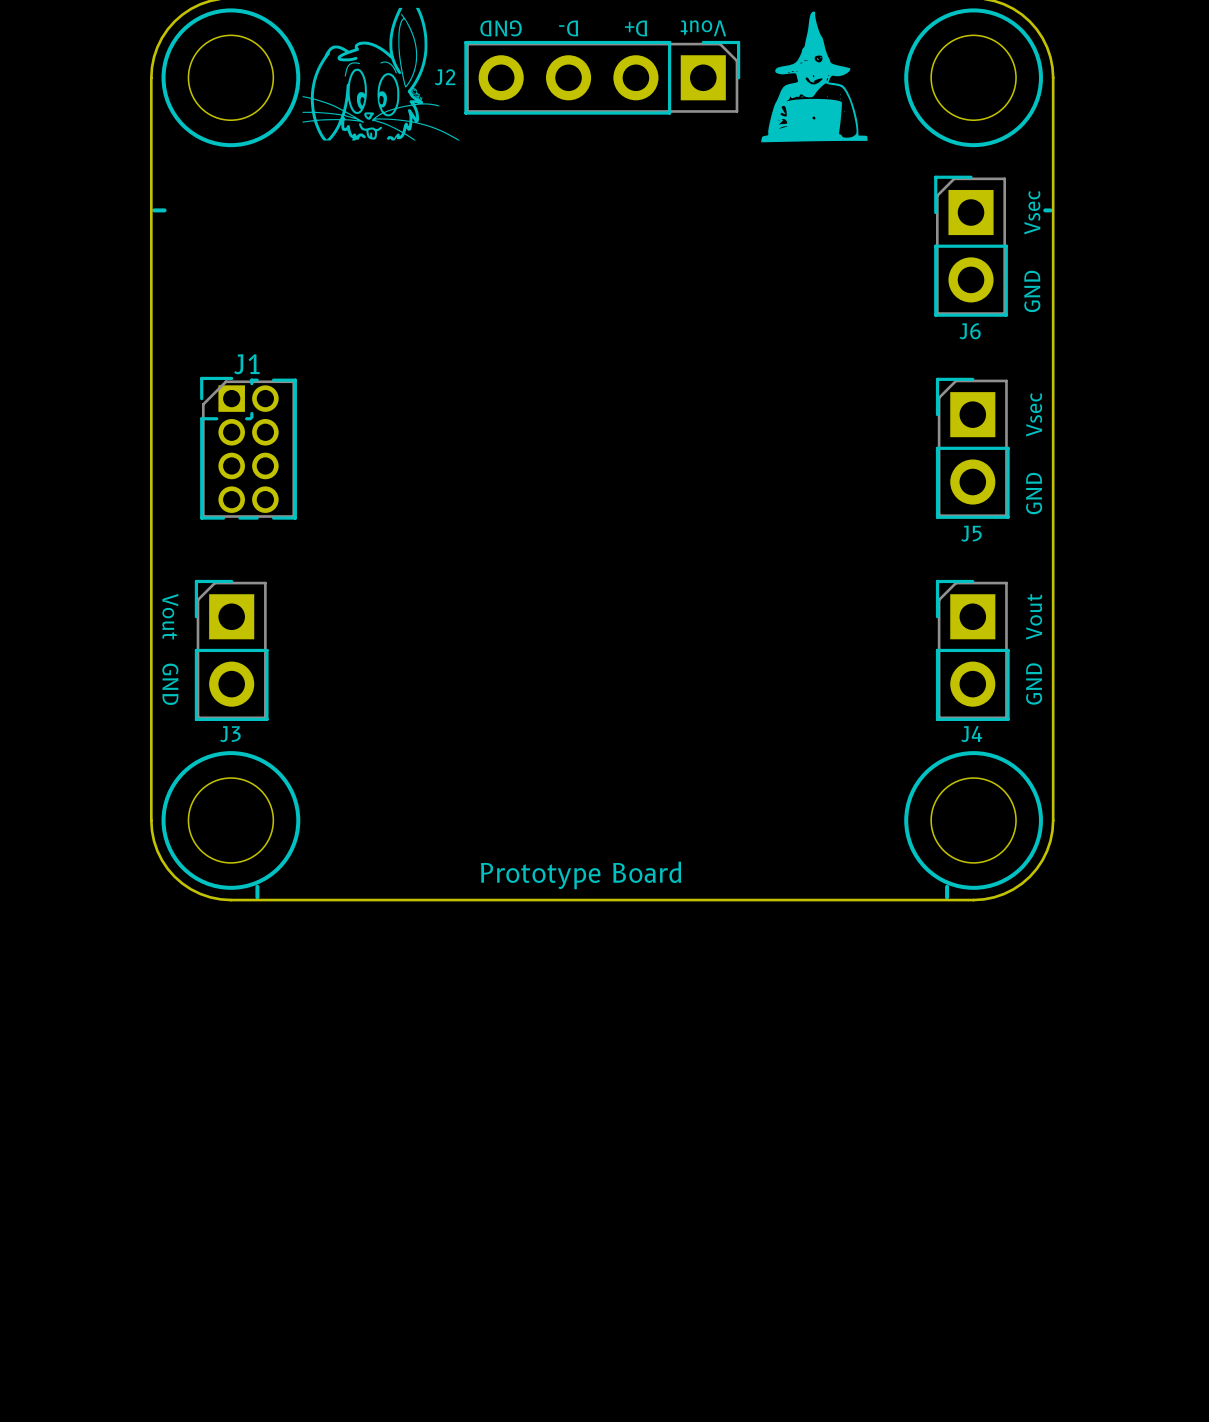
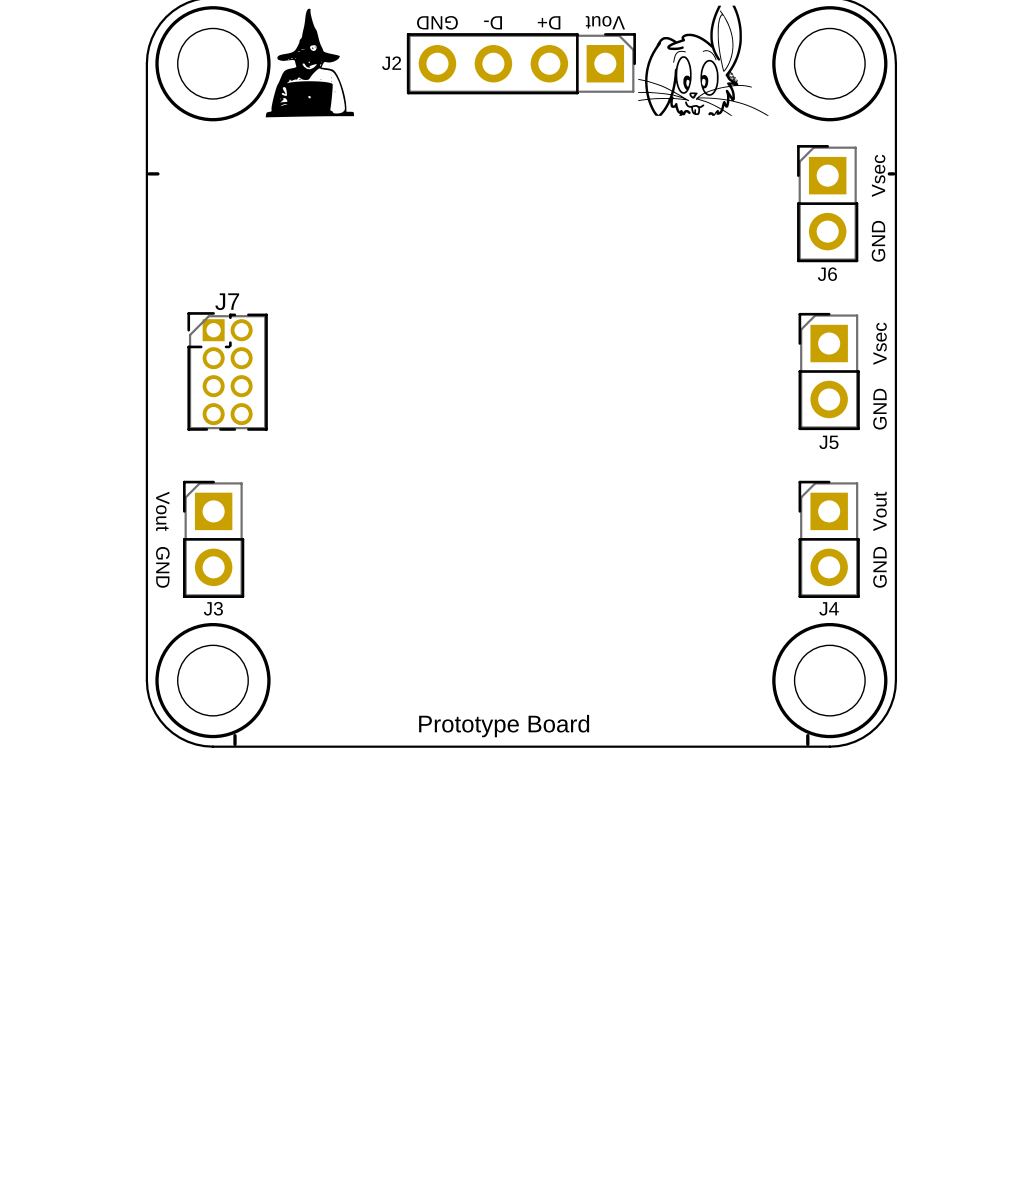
drawing position: (381, 74) -> (703, 60)
drawing position: (814, 76) -> (309, 63)
J1 name: J1 (246, 364) -> J7 (227, 301)

